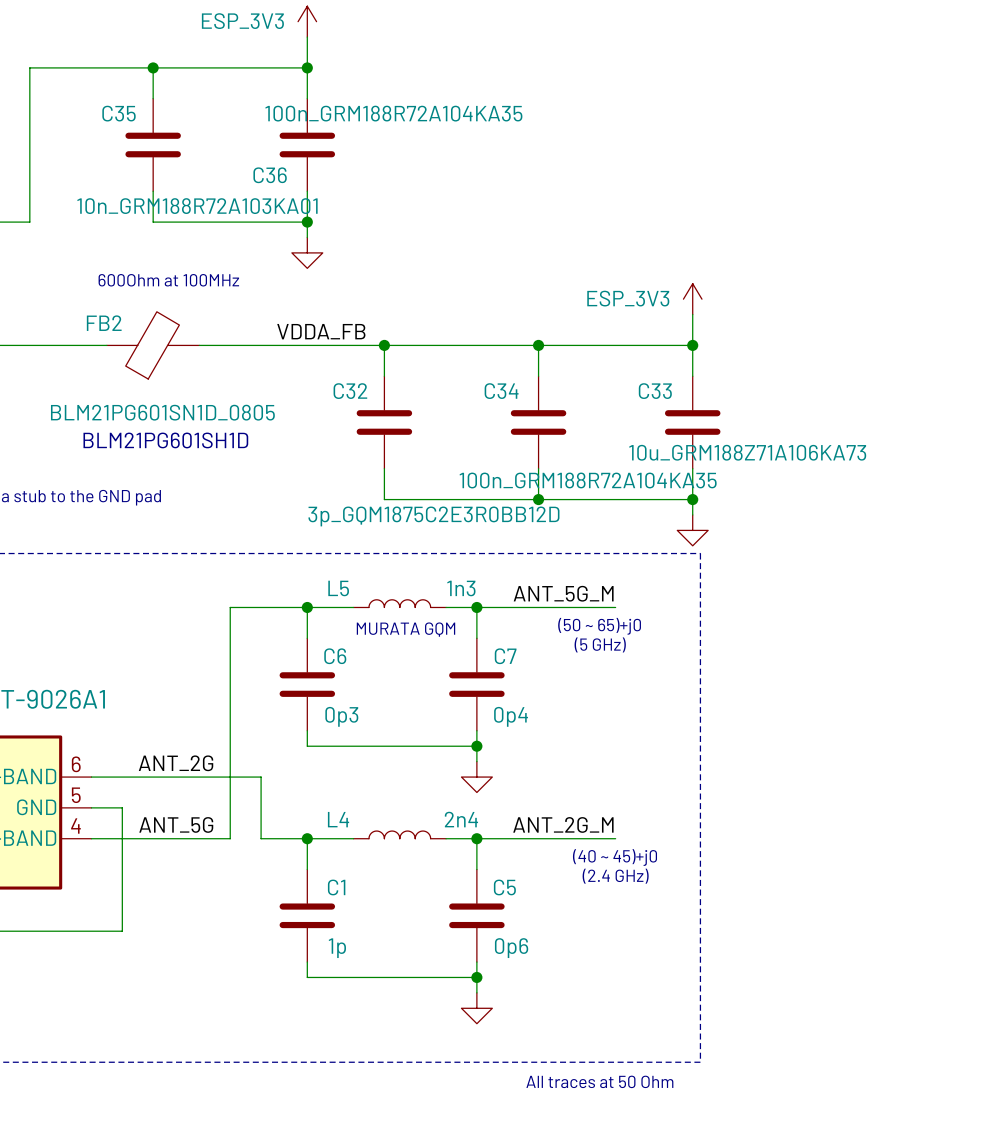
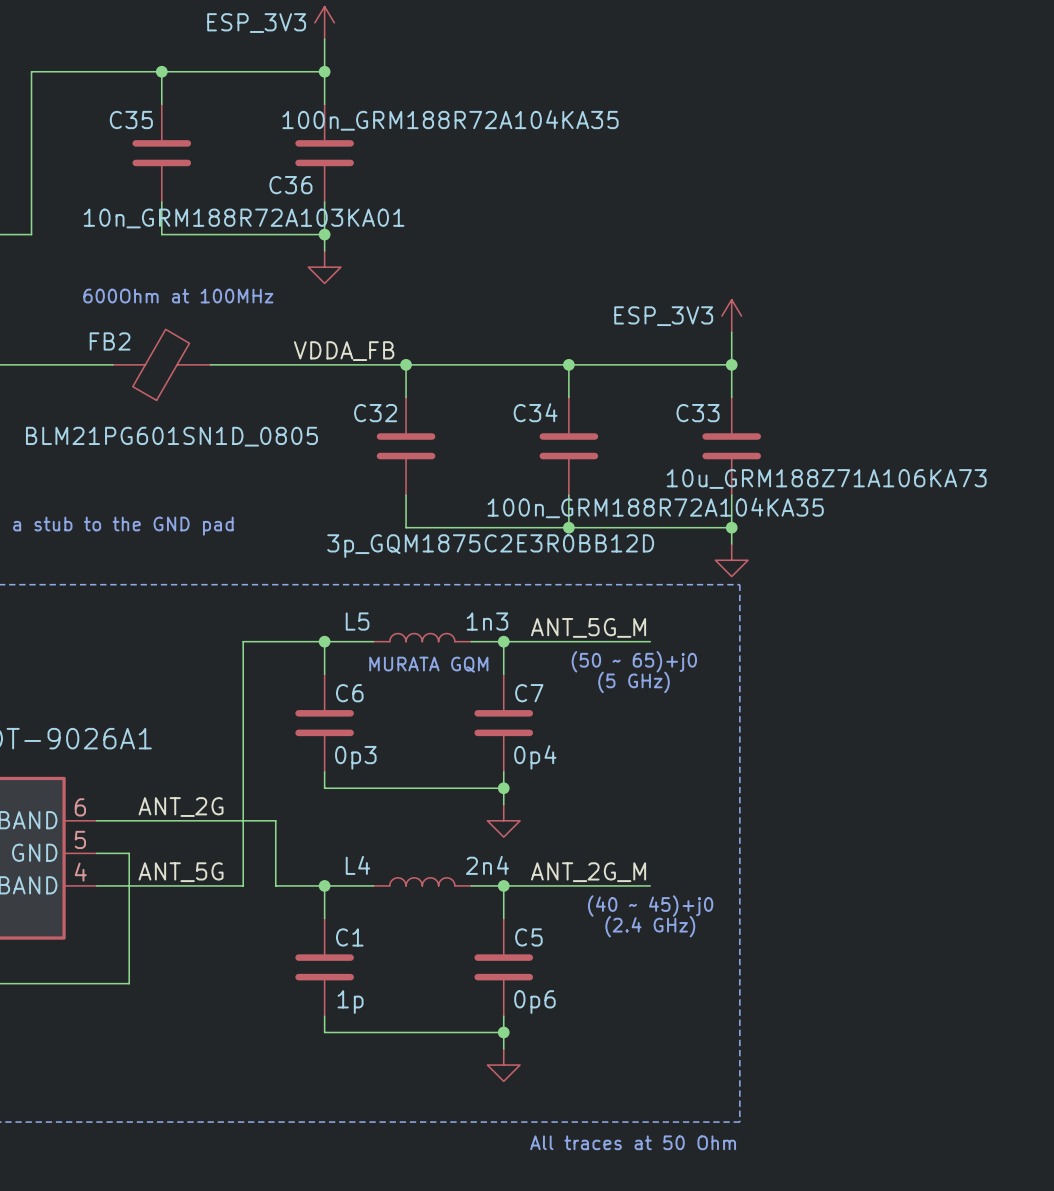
text: BLM21PG601SH1D (165, 440) -> none

